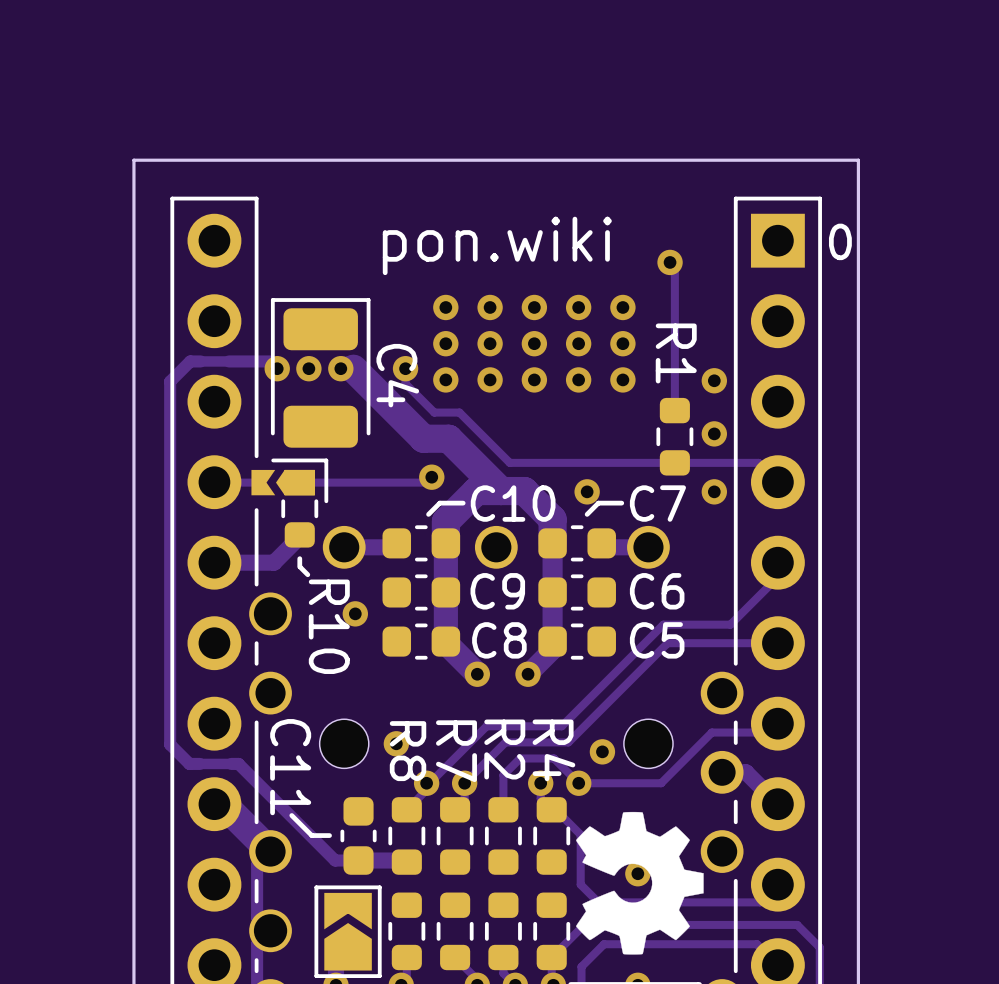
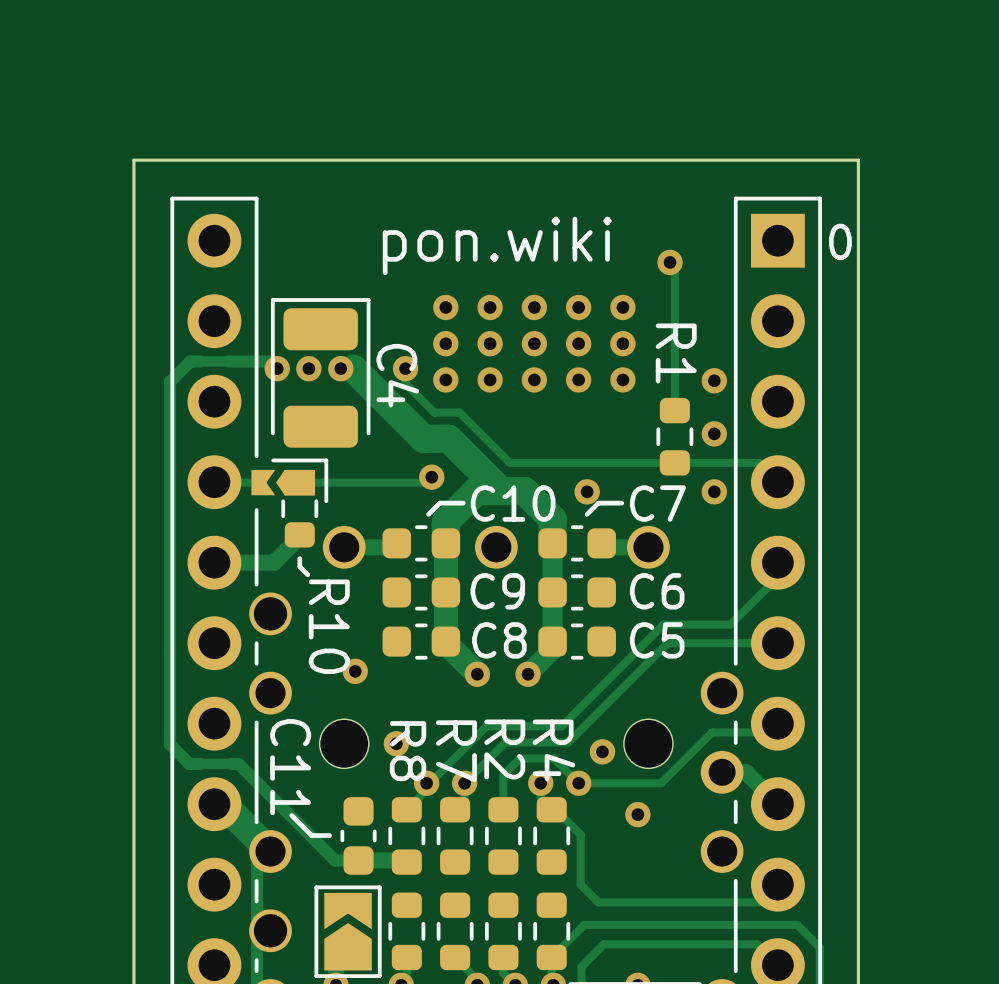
via position: (355, 613) -> (355, 671)
drawing: [576, 811, 704, 955] -> none
via position: (637, 873) -> (637, 814)

